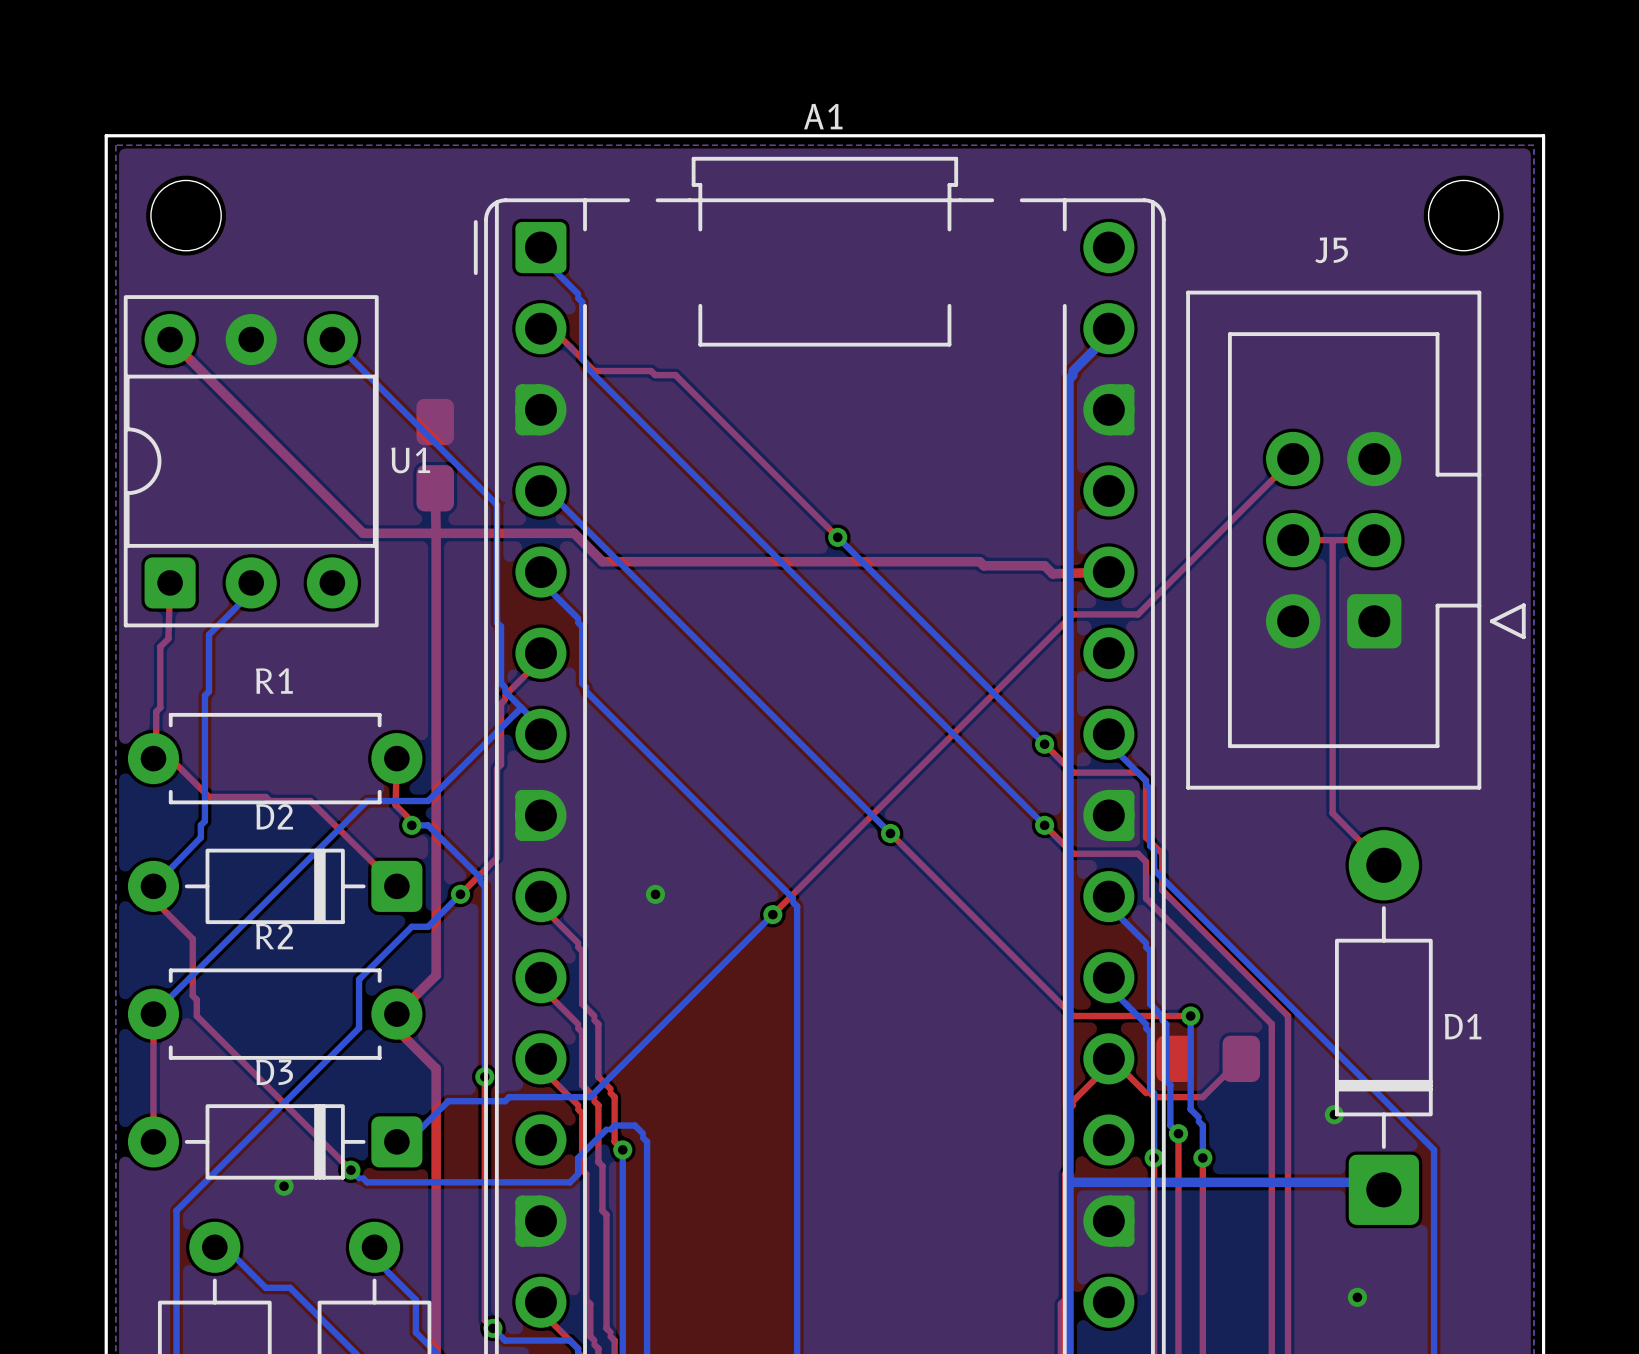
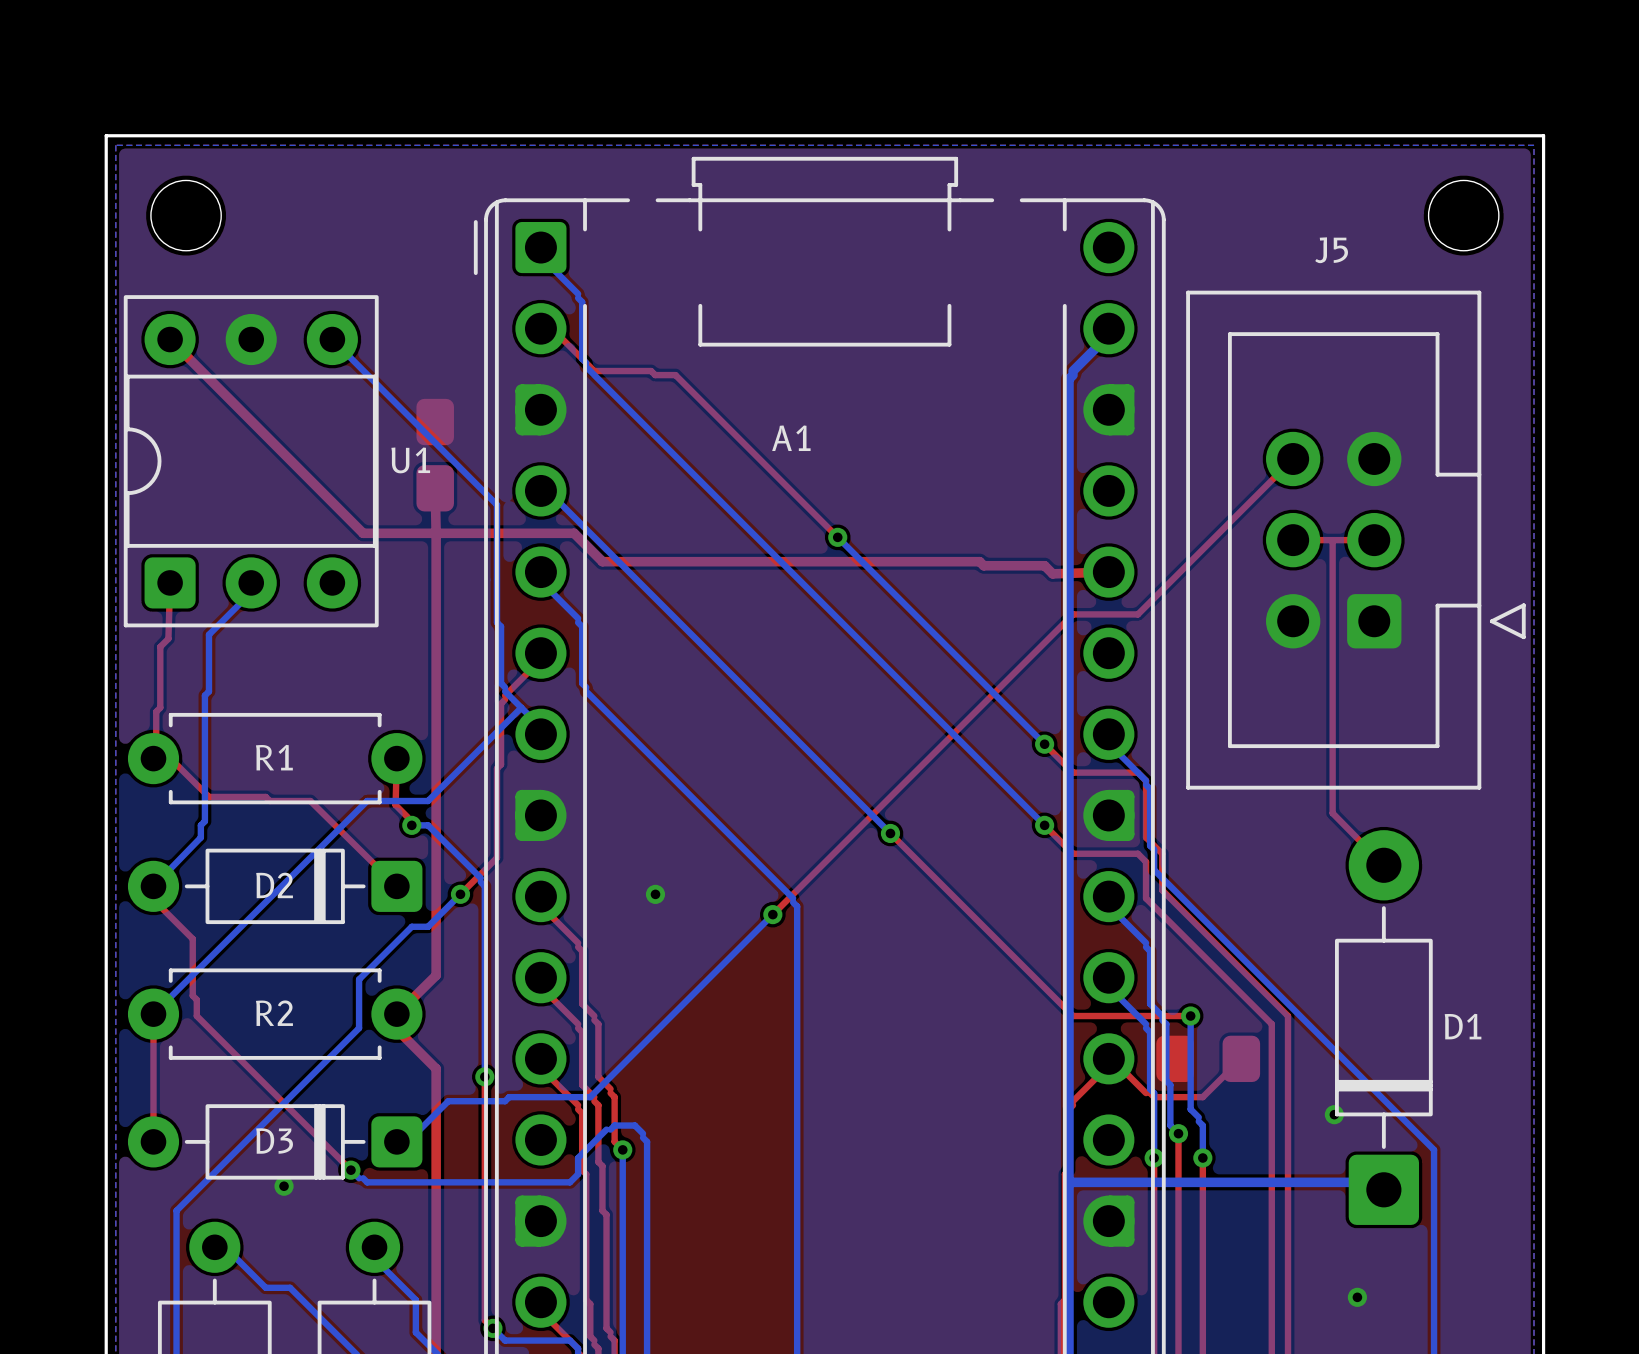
A1 name position: A1 (823, 116) -> A1 (791, 438)
R1 name position: R1 (274, 680) -> R1 (274, 757)
D2 name position: D2 (274, 816) -> D2 (274, 885)
R2 name position: R2 (274, 936) -> R2 (274, 1013)
D3 name position: D3 (274, 1072) -> D3 (274, 1141)

